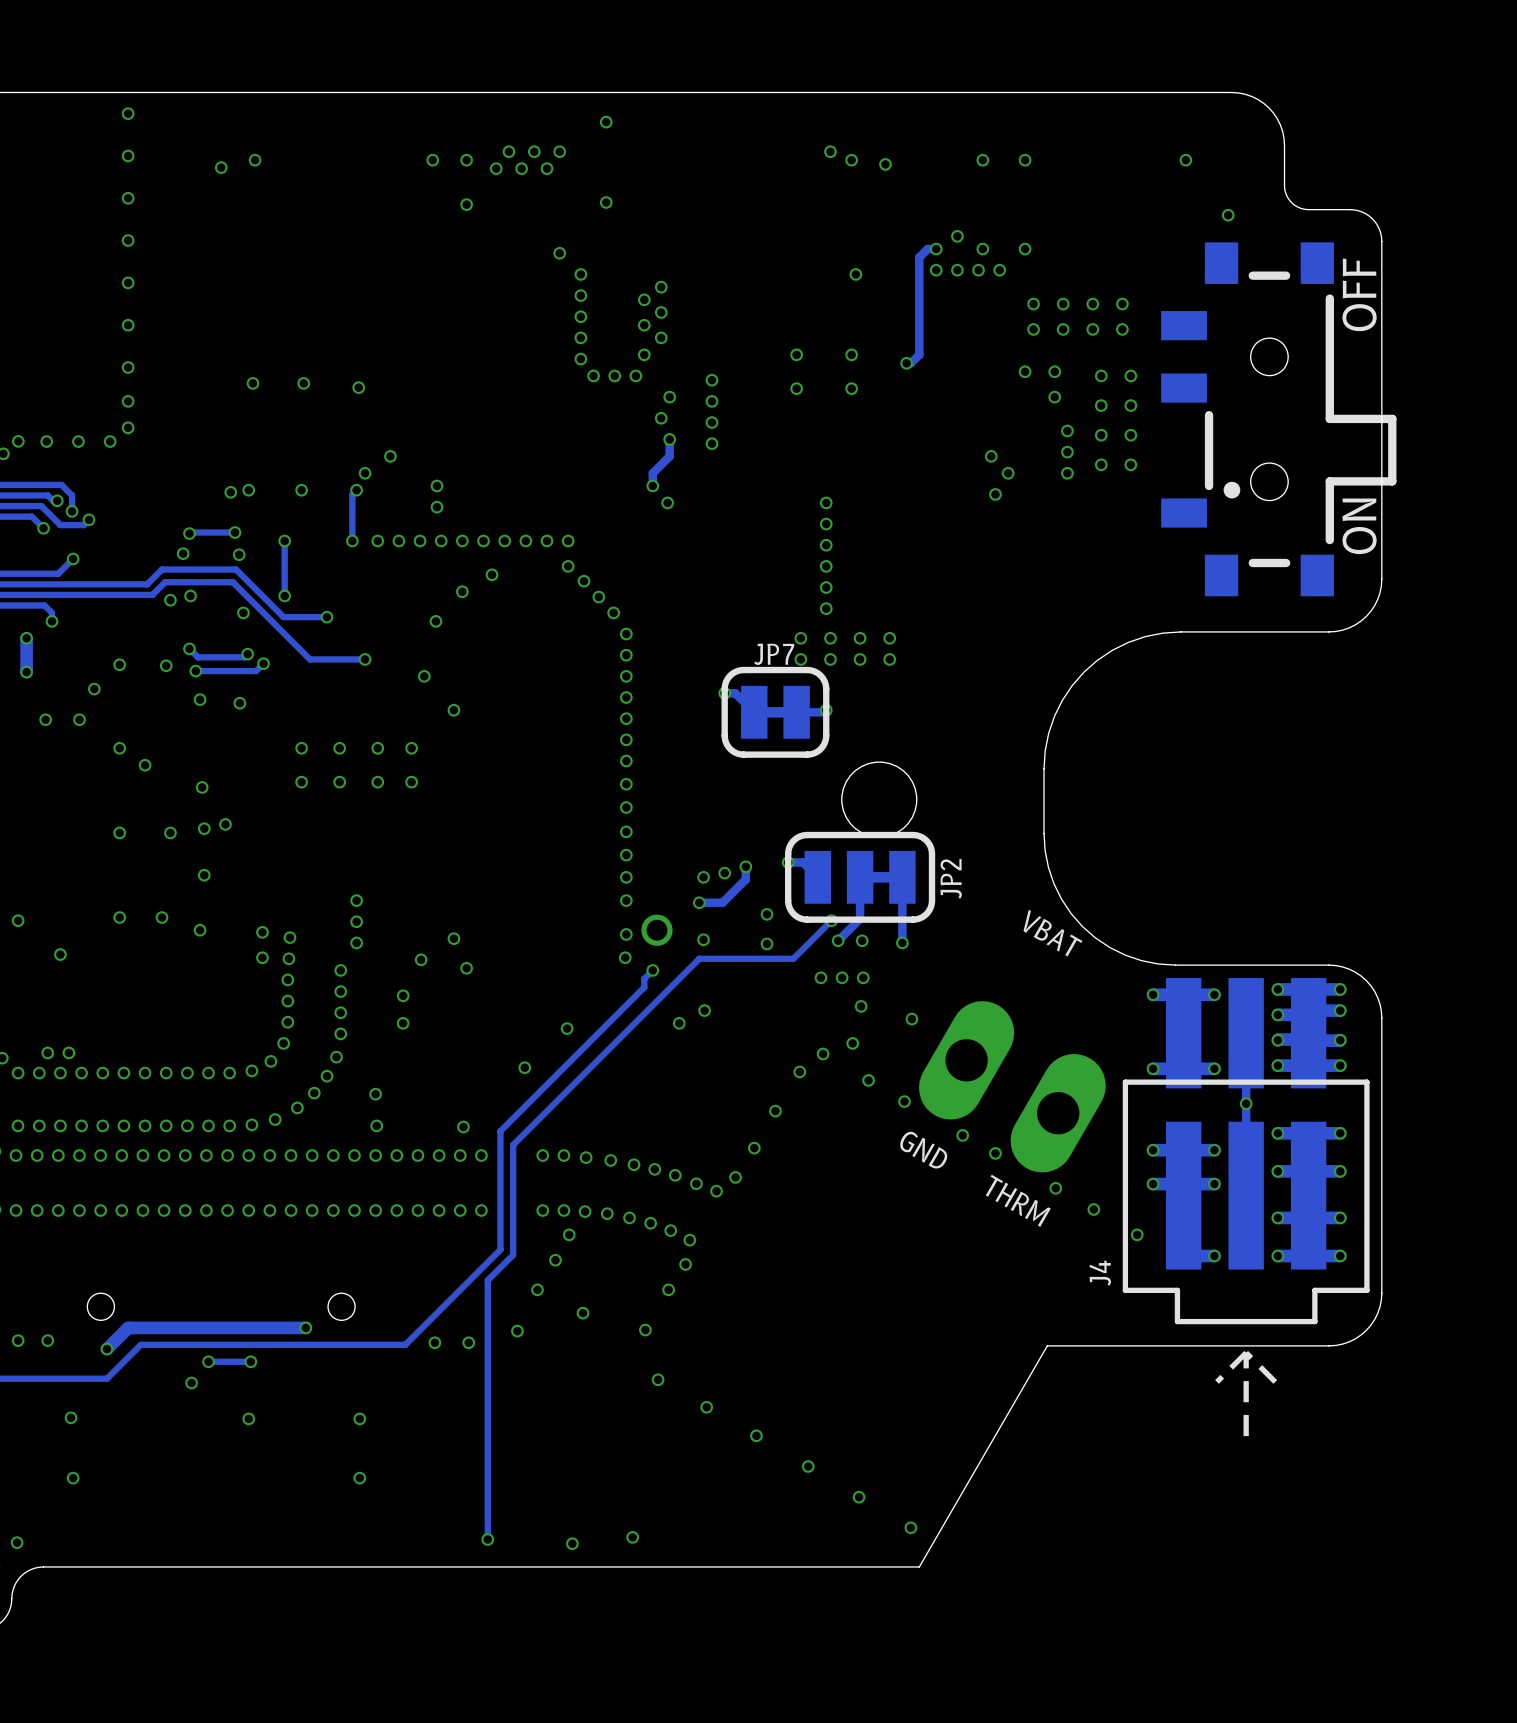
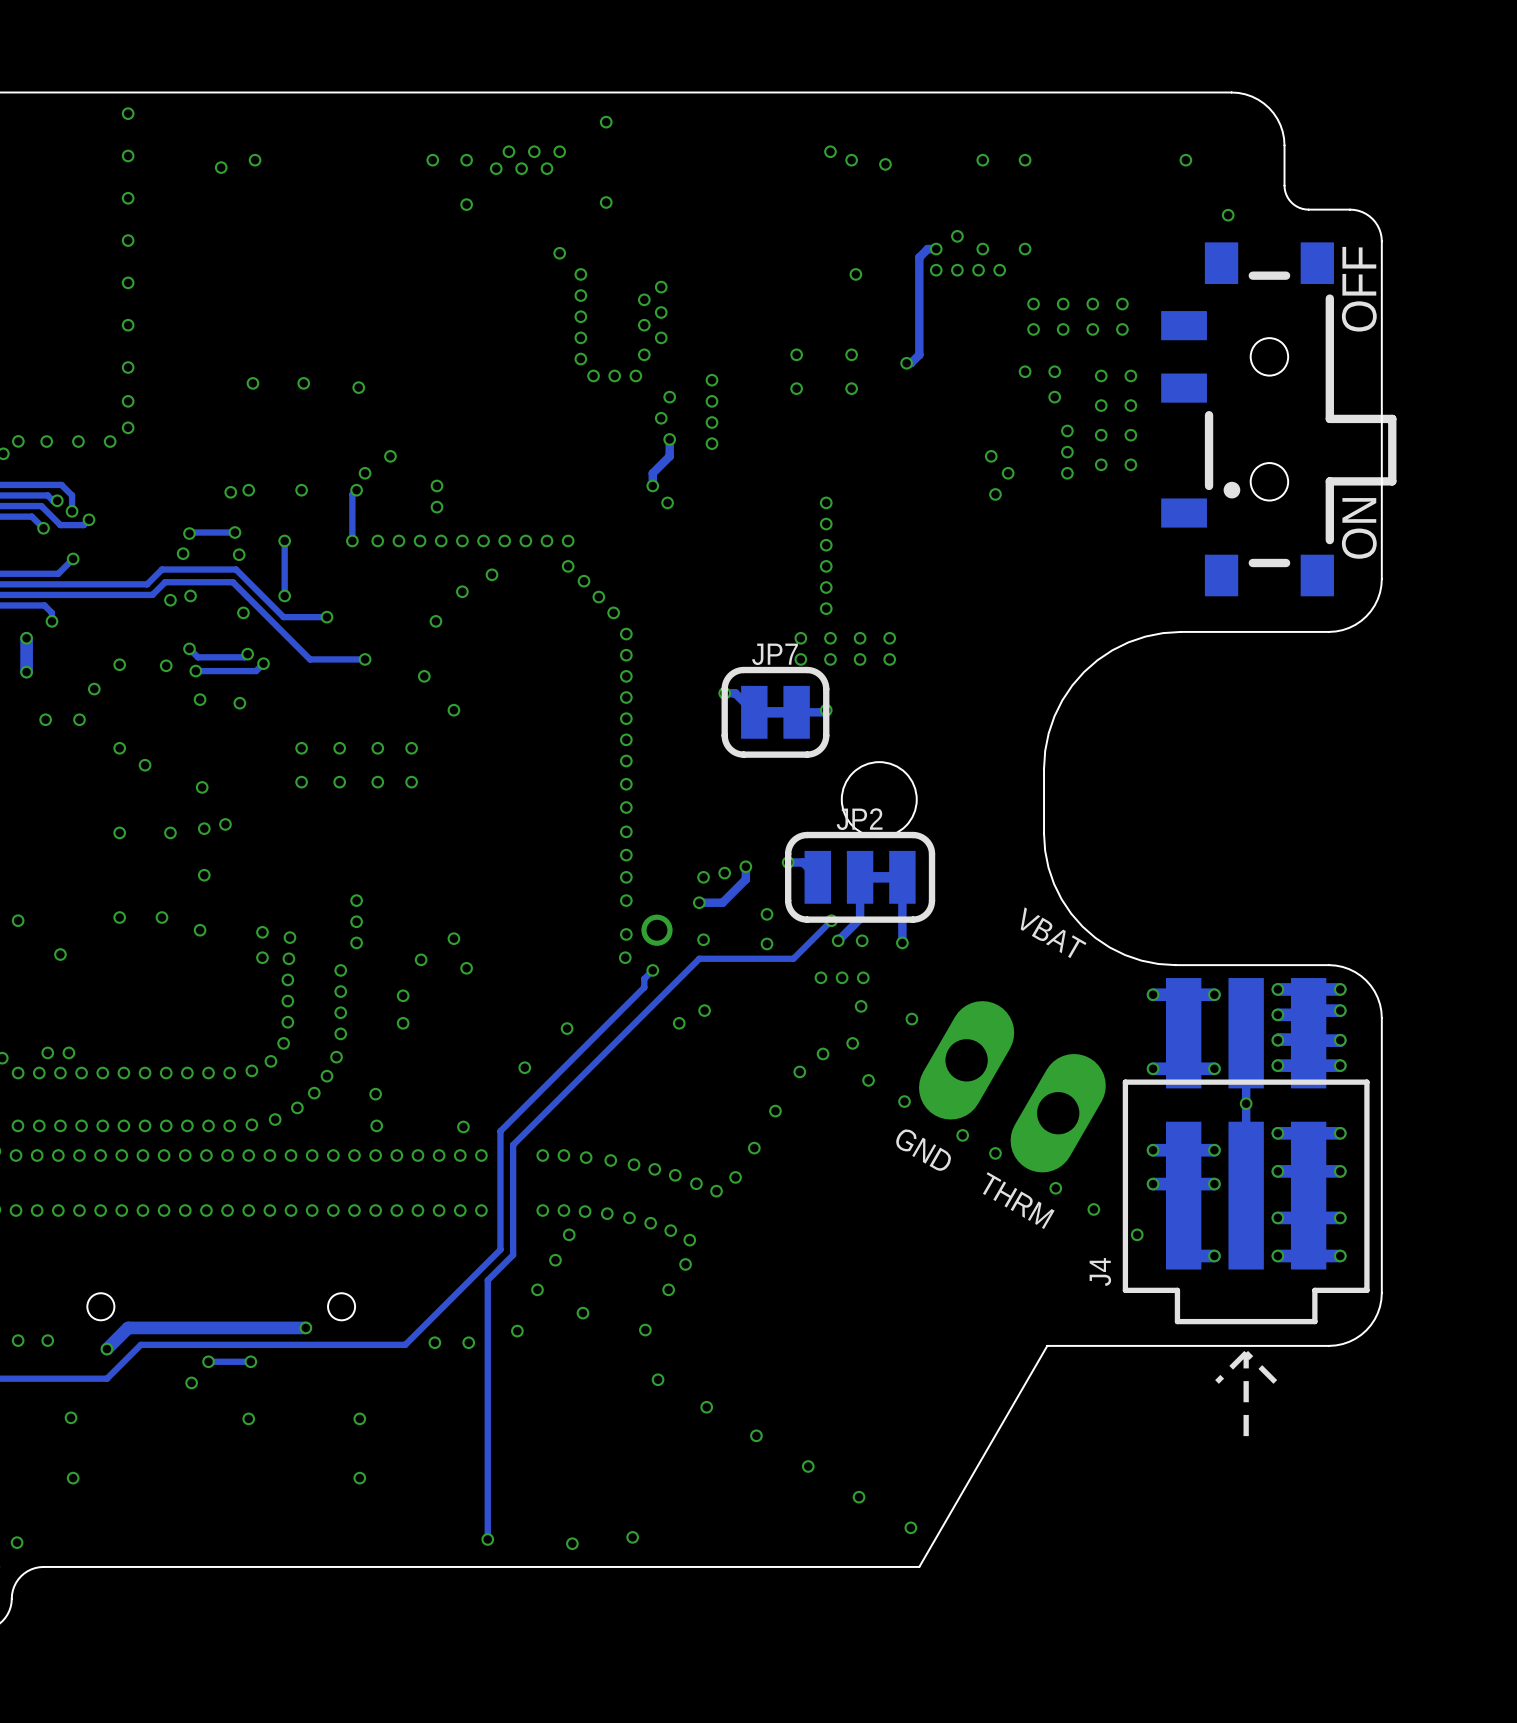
JP2 name rotation: 0° (951, 878) -> 90° clockwise (859, 819)
JP2 name position: JP2 (951, 878) -> JP2 (859, 819)

